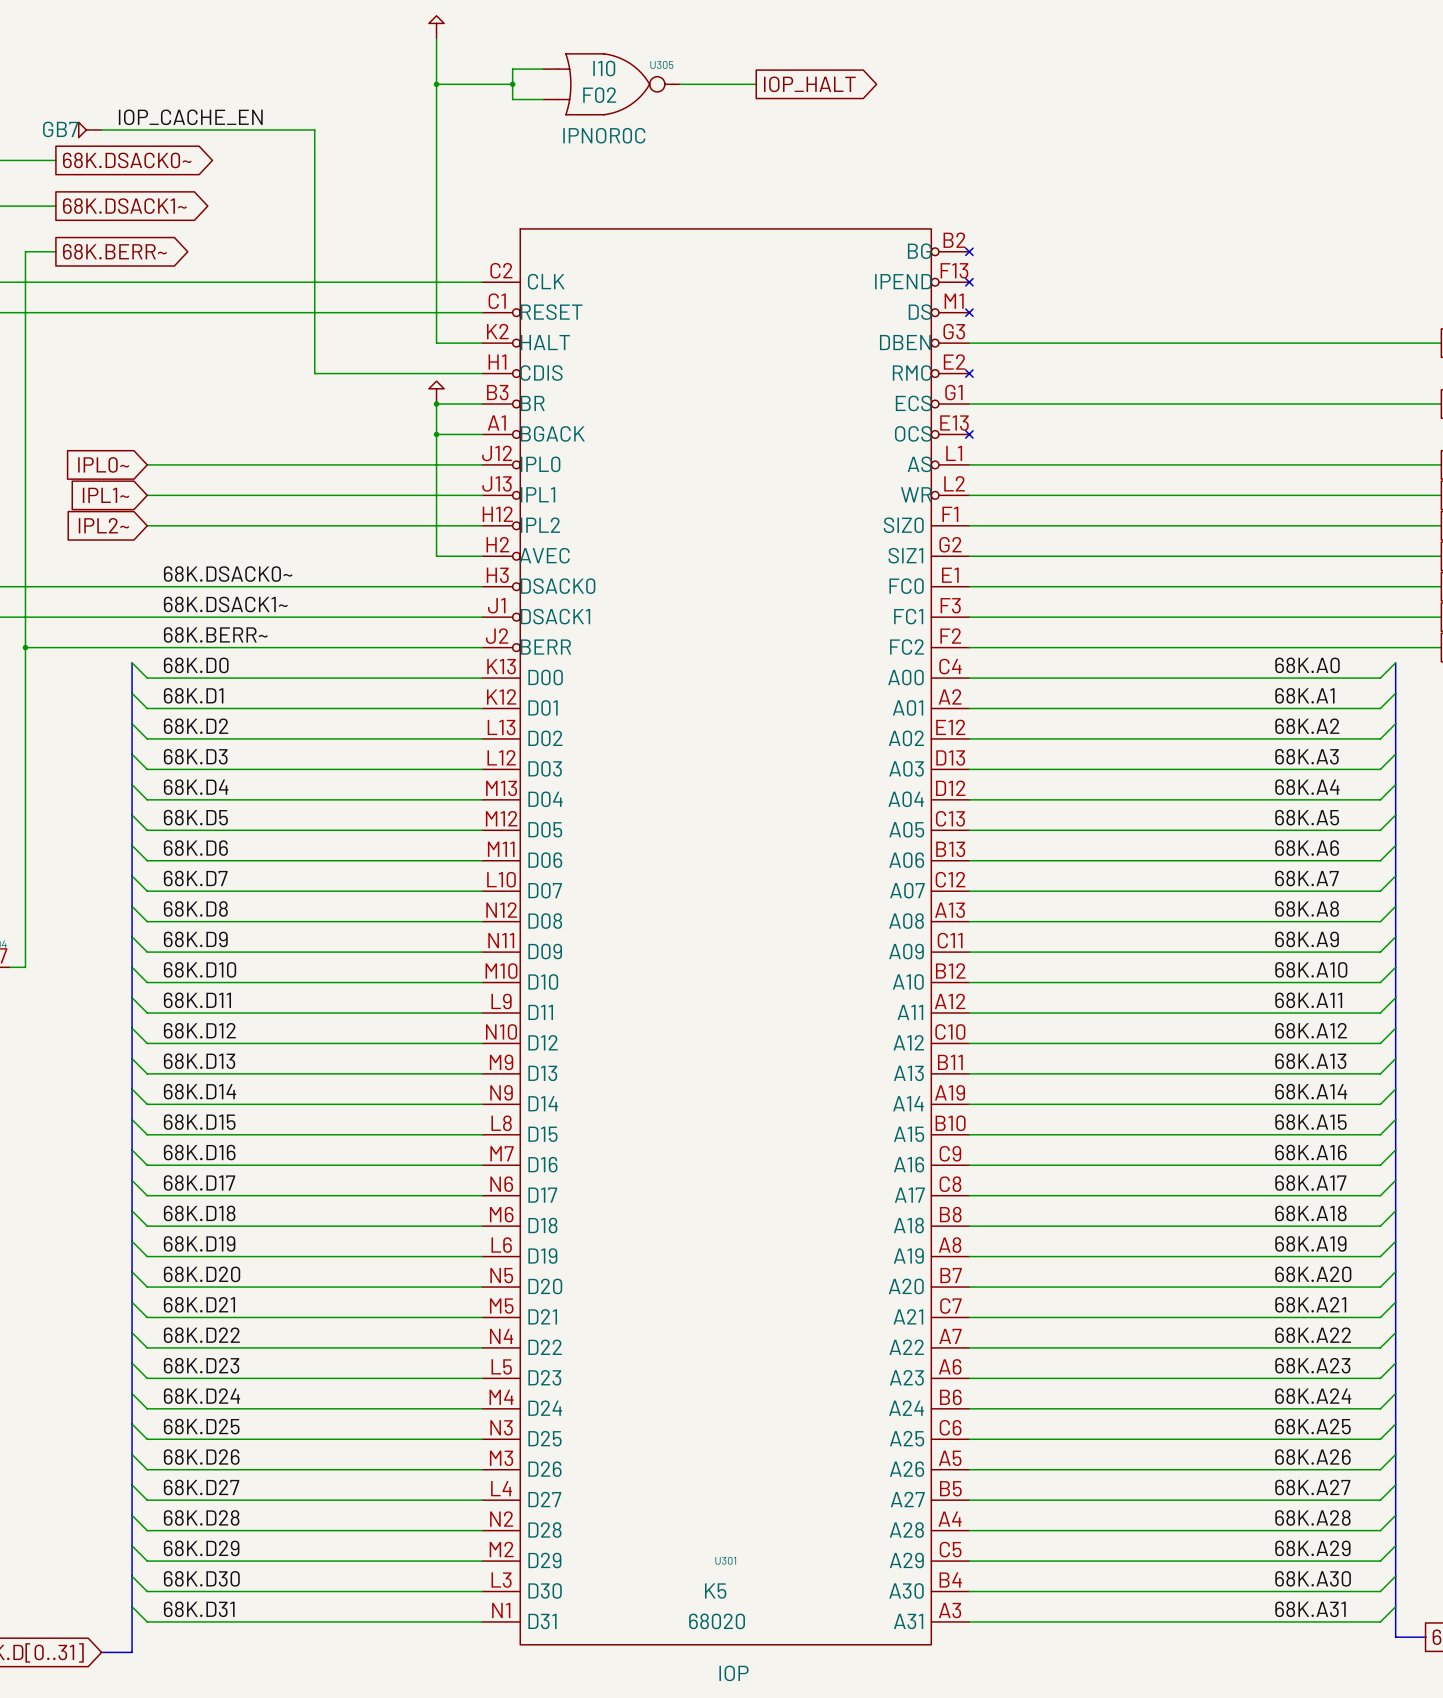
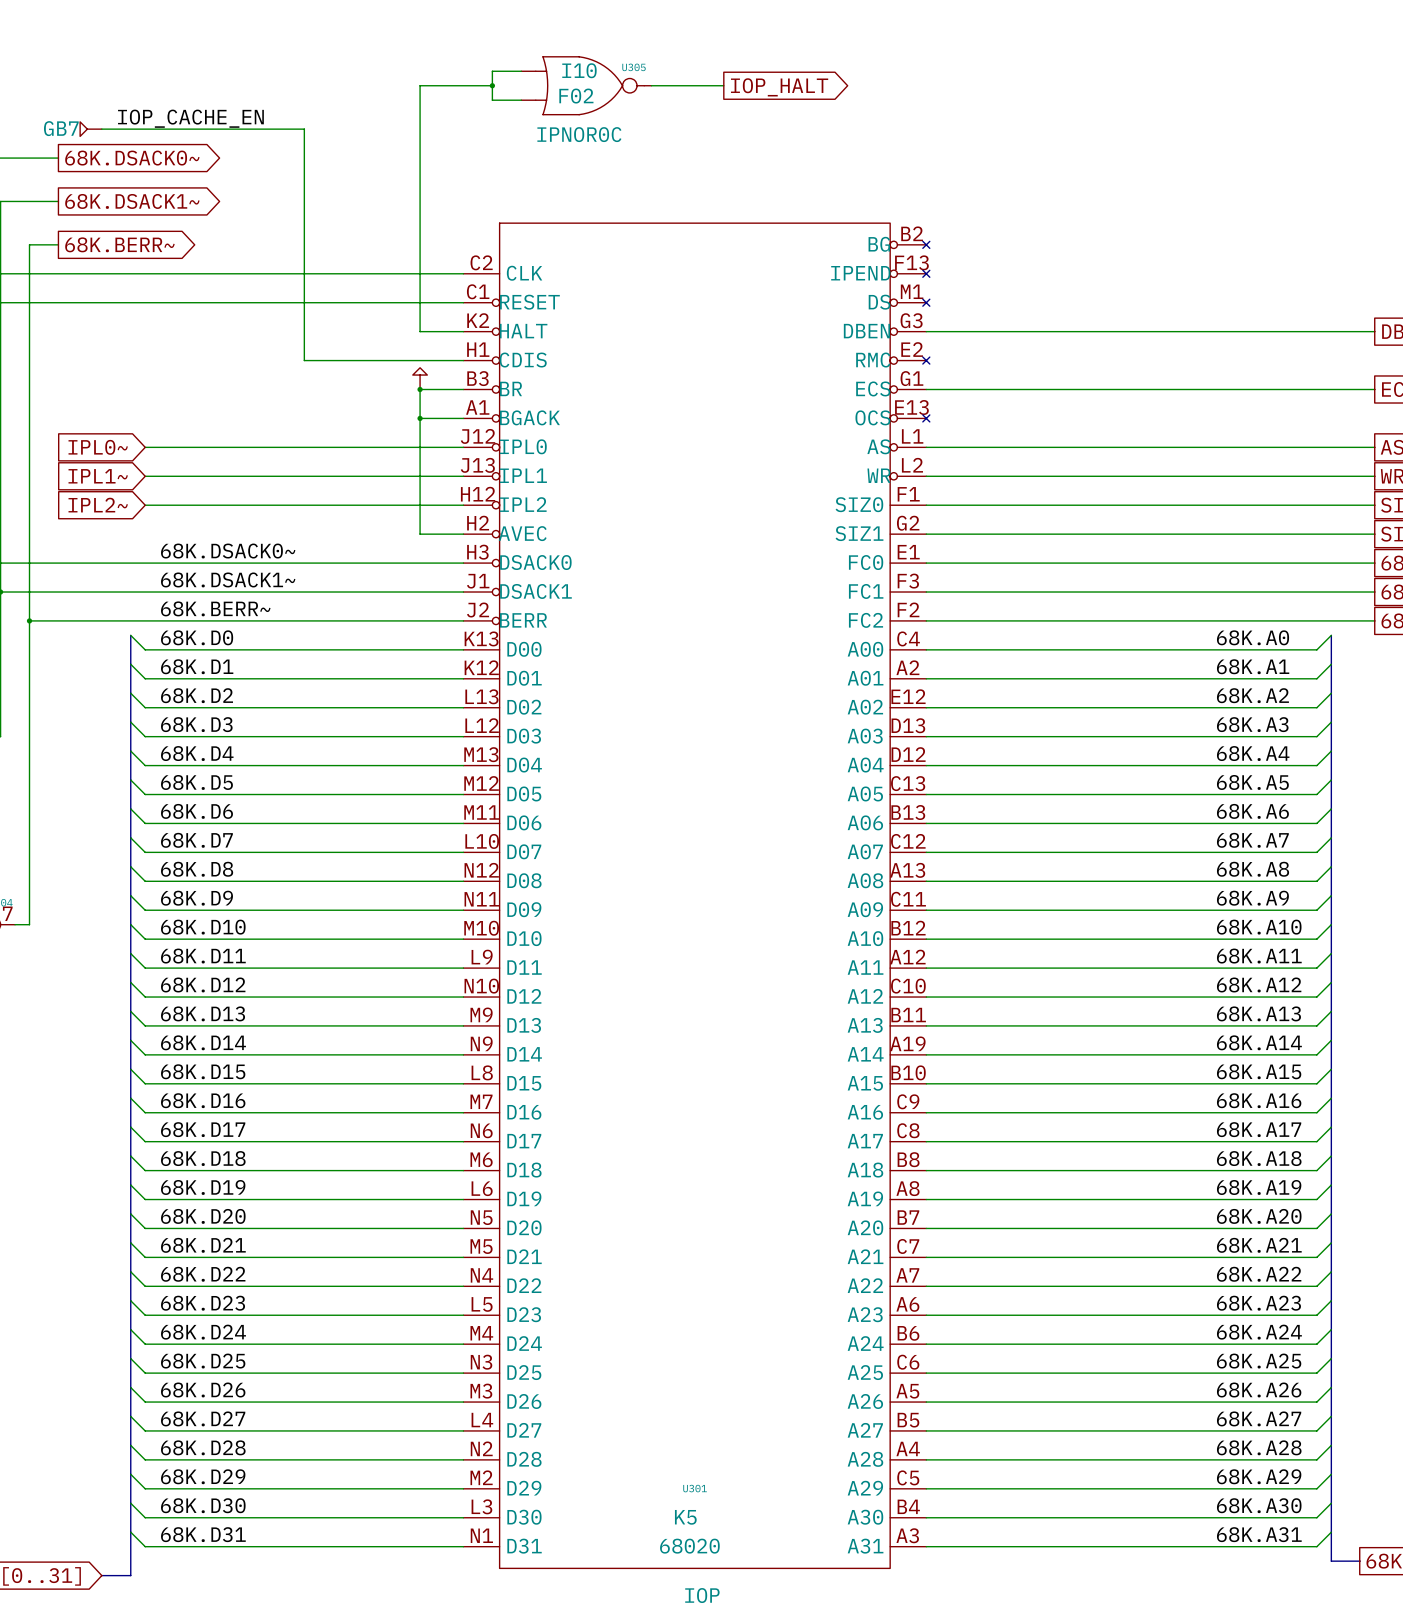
power symbol: (436, 26) -> none
wire: (436, 38) (436, 84) -> none
junction: (436, 84) -> none

